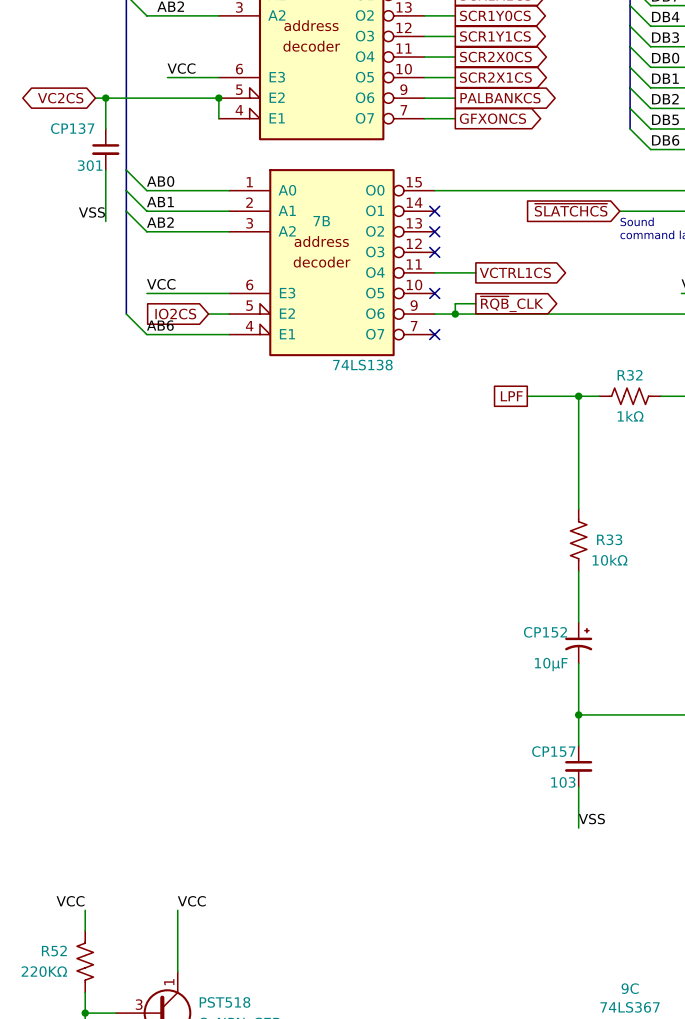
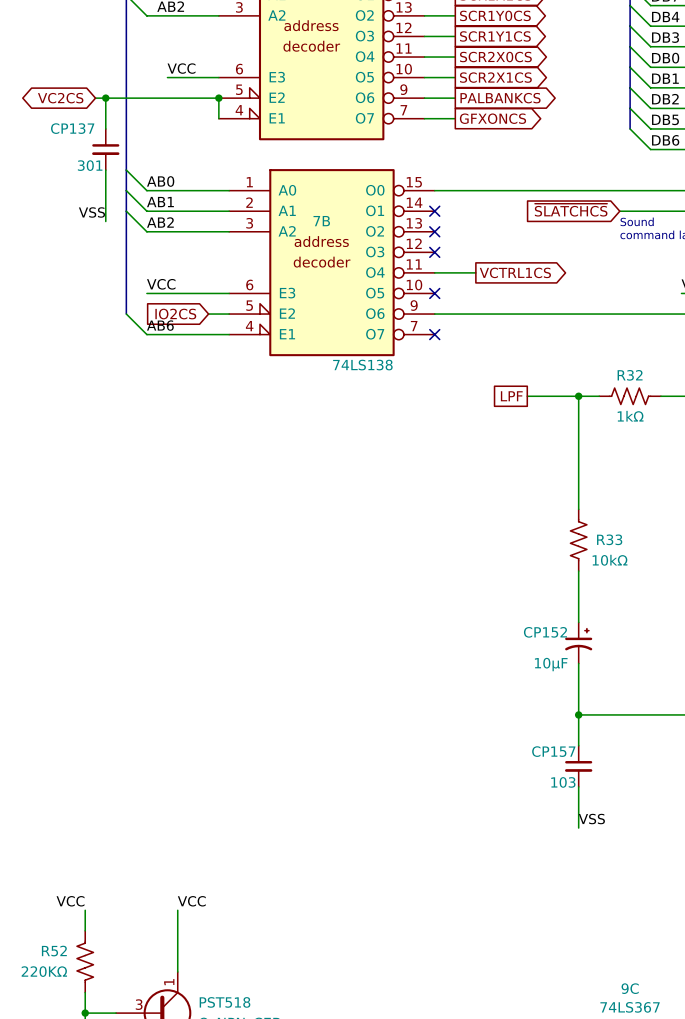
wire: (475, 303) (455, 303) (455, 314) -> none
global label: ~{RQB}_CLK (511, 304) -> none
junction: (455, 314) -> none

